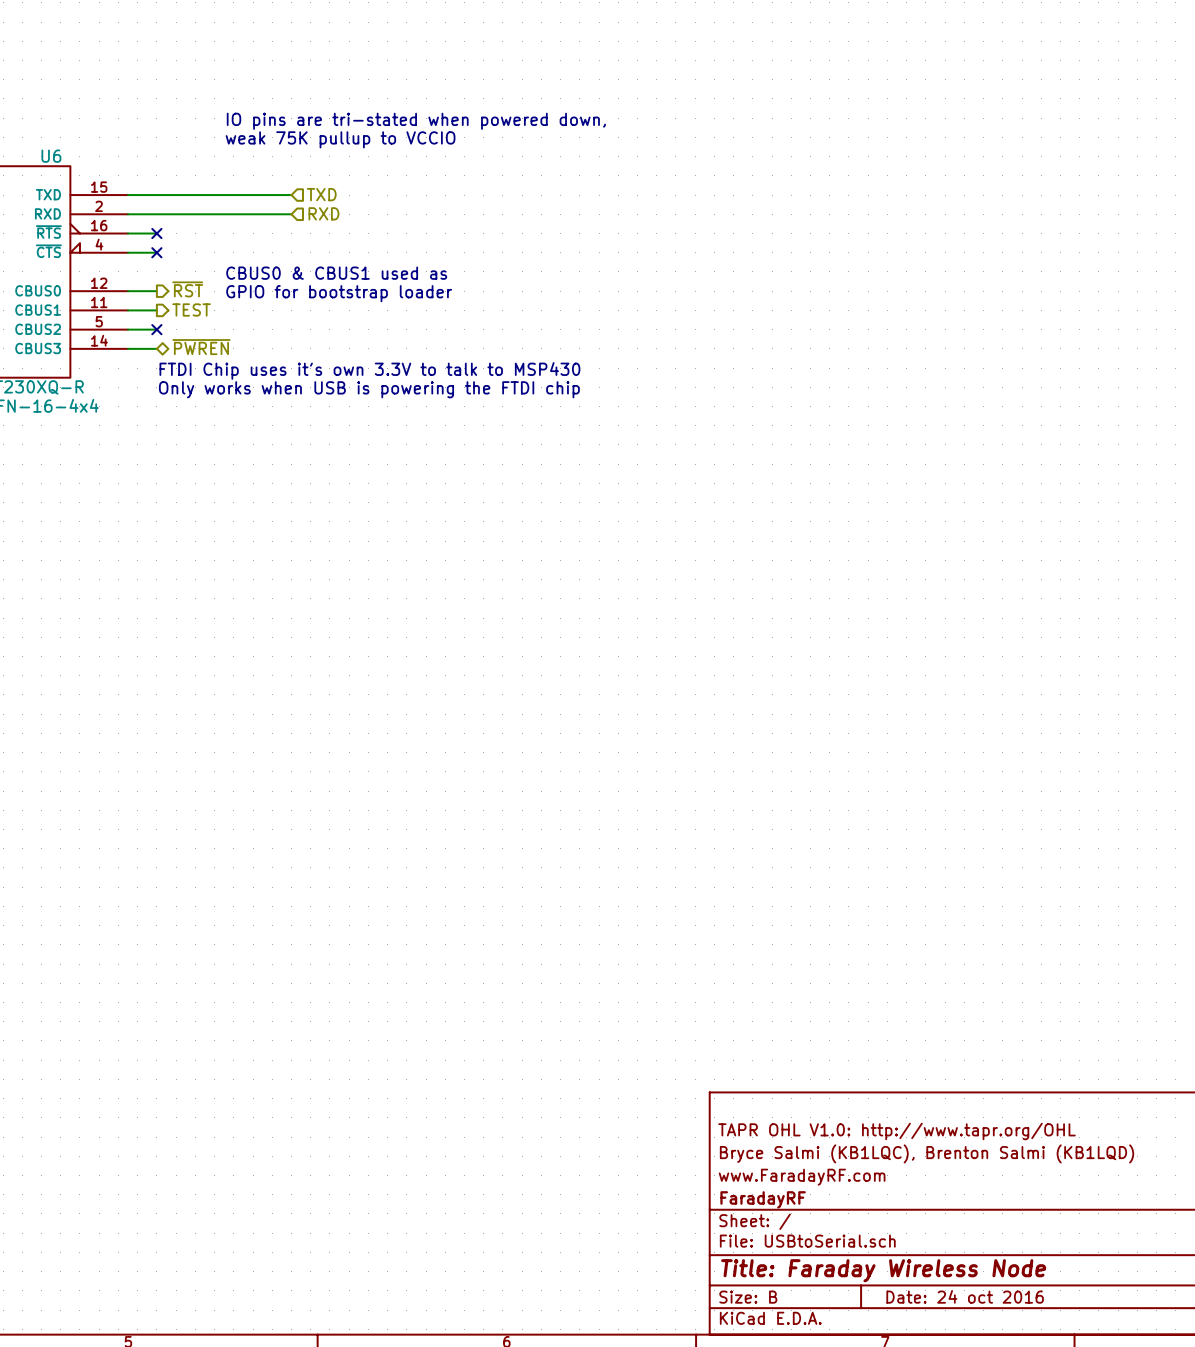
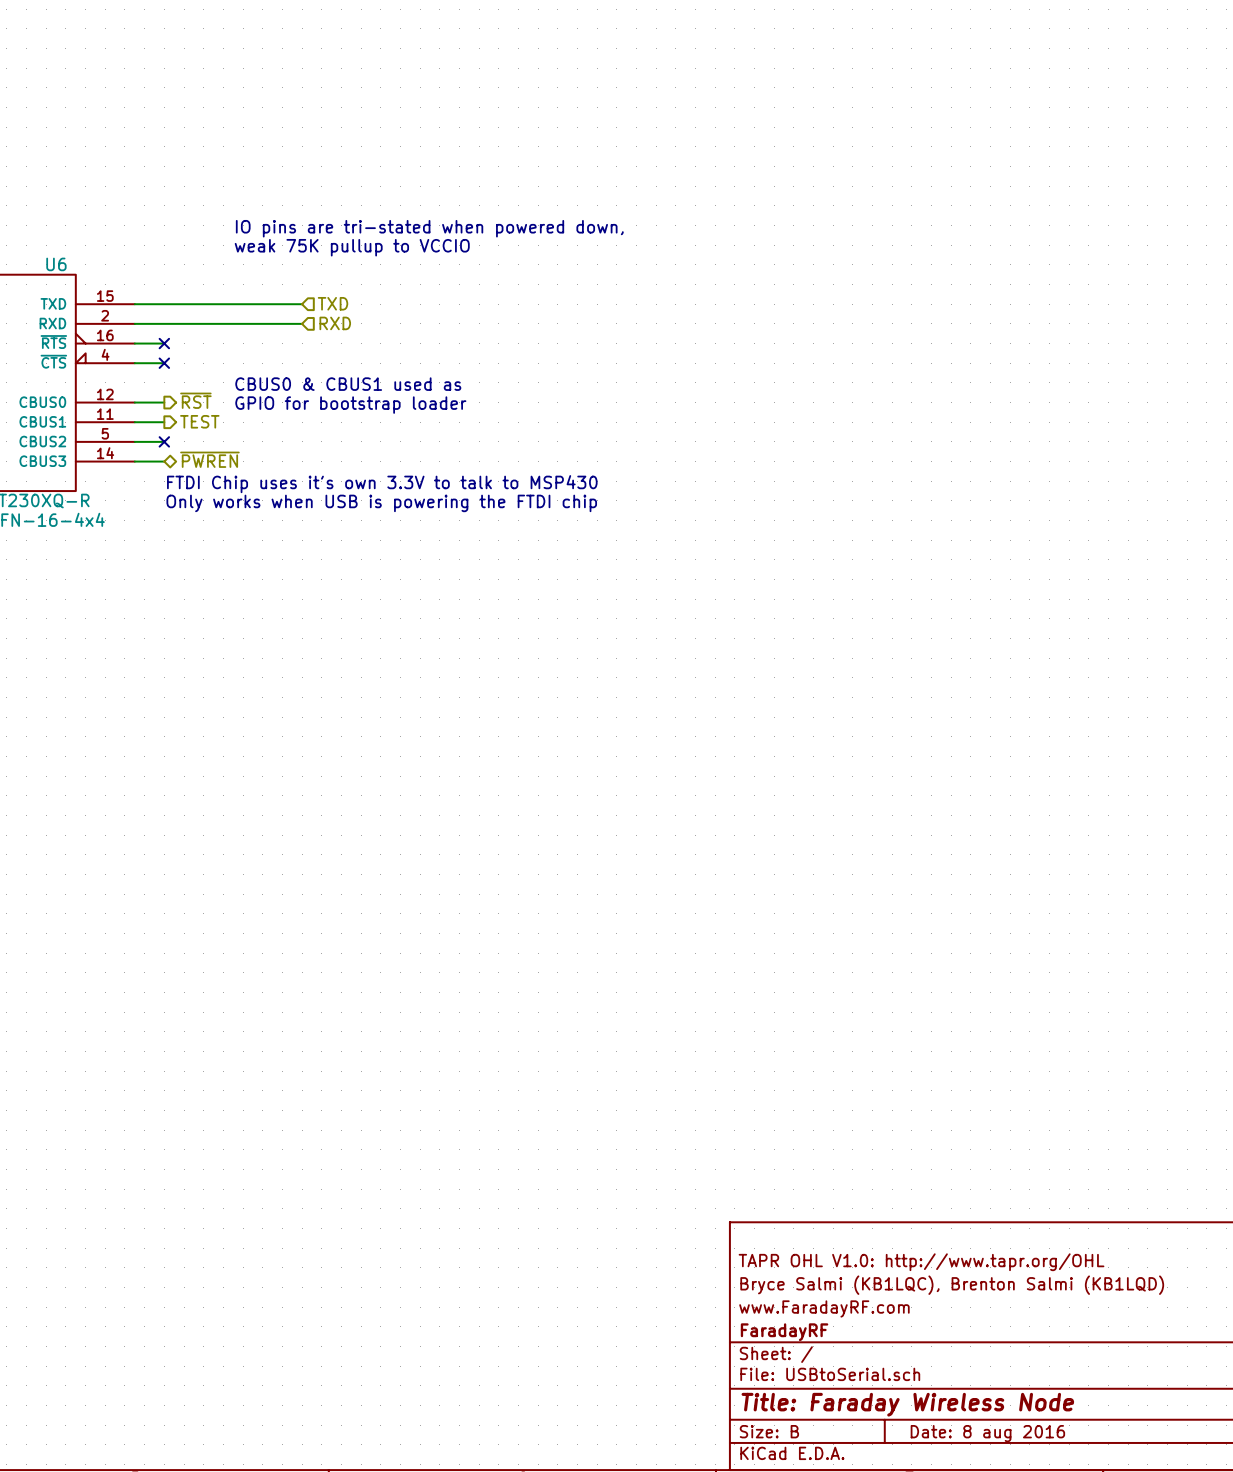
title block: Date: 24 oct 2016 (965, 1296) -> Date: 8 aug 2016 (987, 1433)

